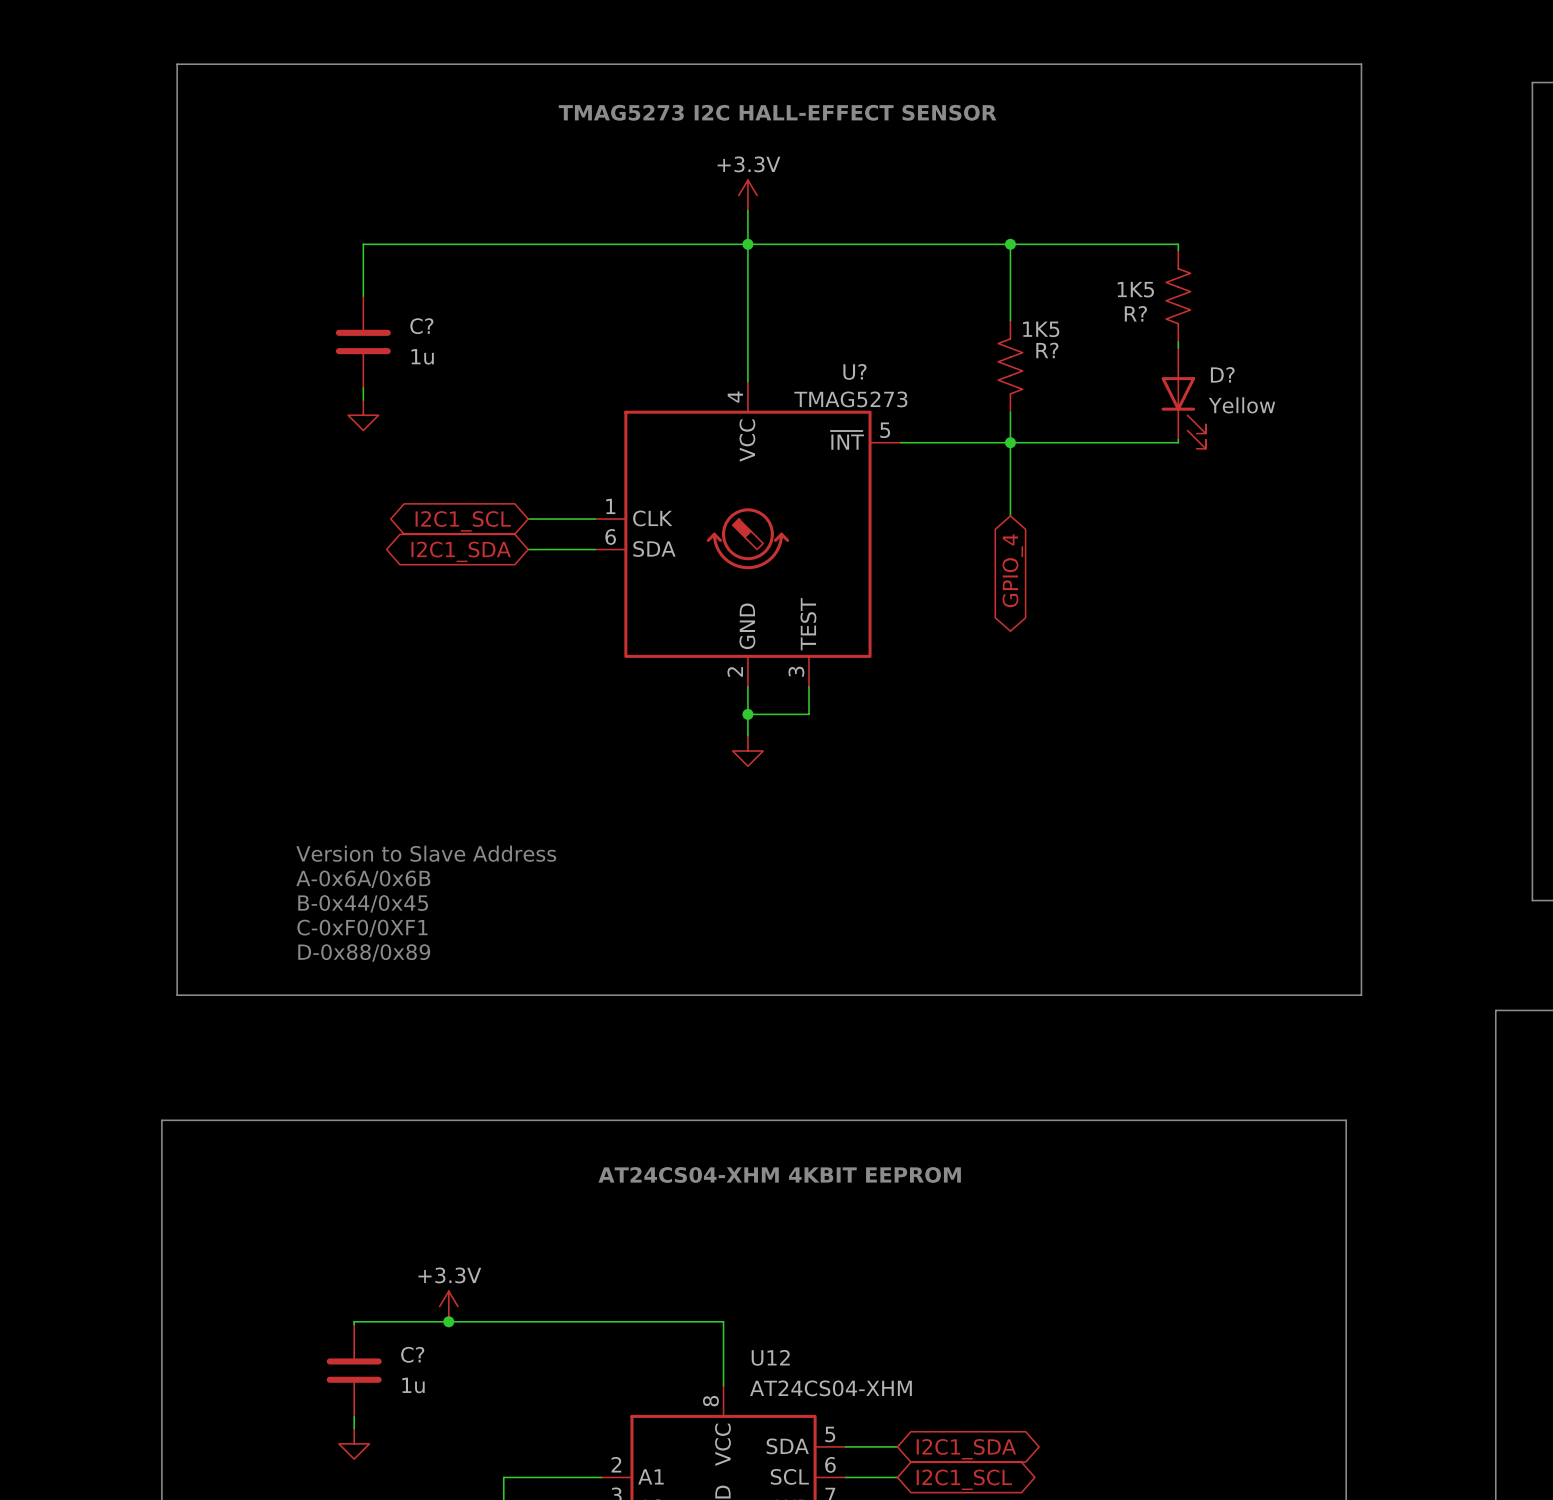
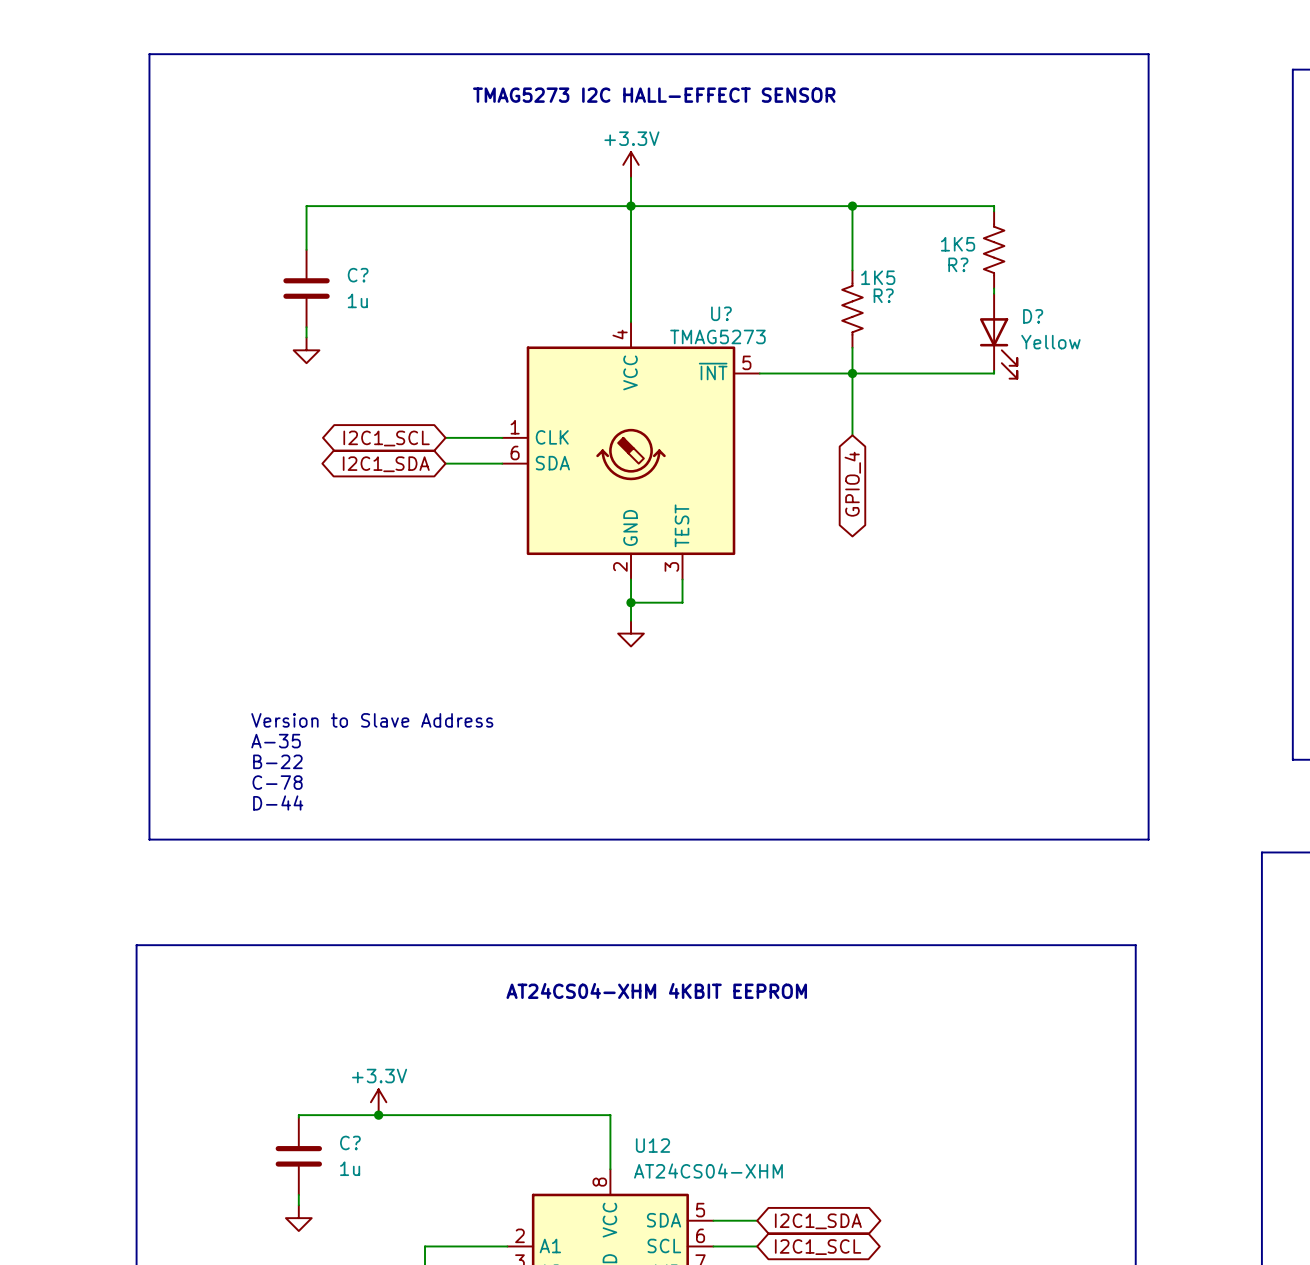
text: A-0x6A/0x6B (363, 879) -> A-35 (276, 741)
text: B-0x44/0x45 (363, 903) -> B-22 (277, 761)
text: C-0xF0/0XF1 (362, 928) -> C-78 (277, 782)
text: D-0x88/0x89 (364, 952) -> D-44 (278, 802)

